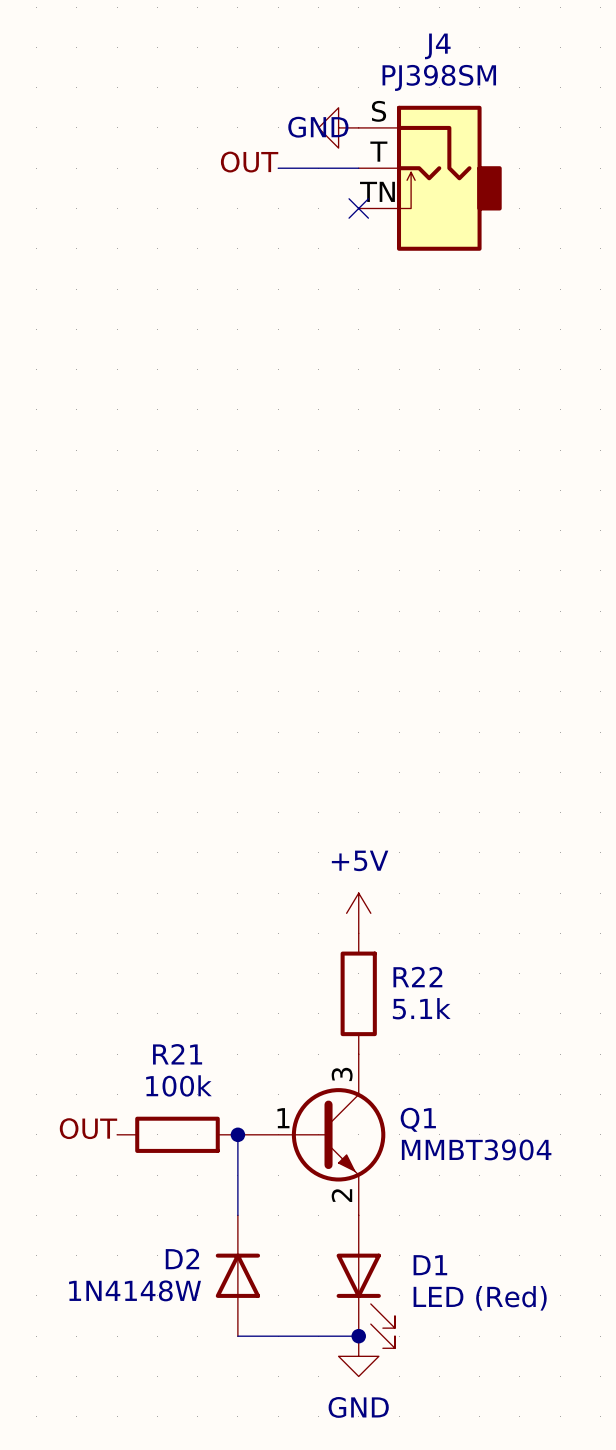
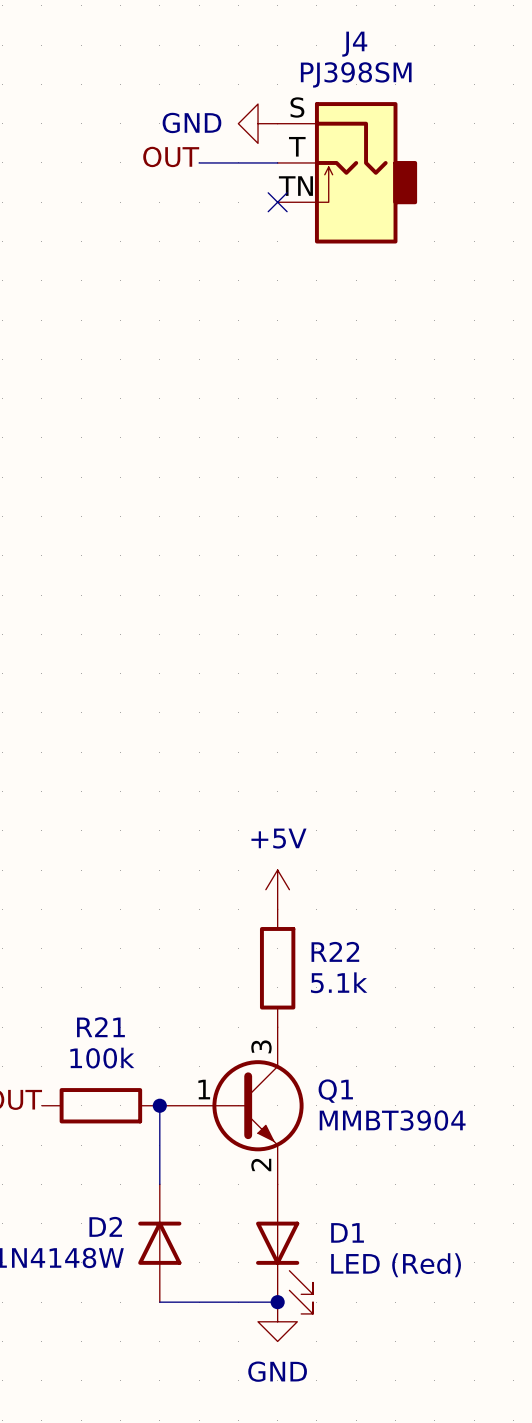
power symbol text position: GND (318, 127) -> GND (191, 122)

